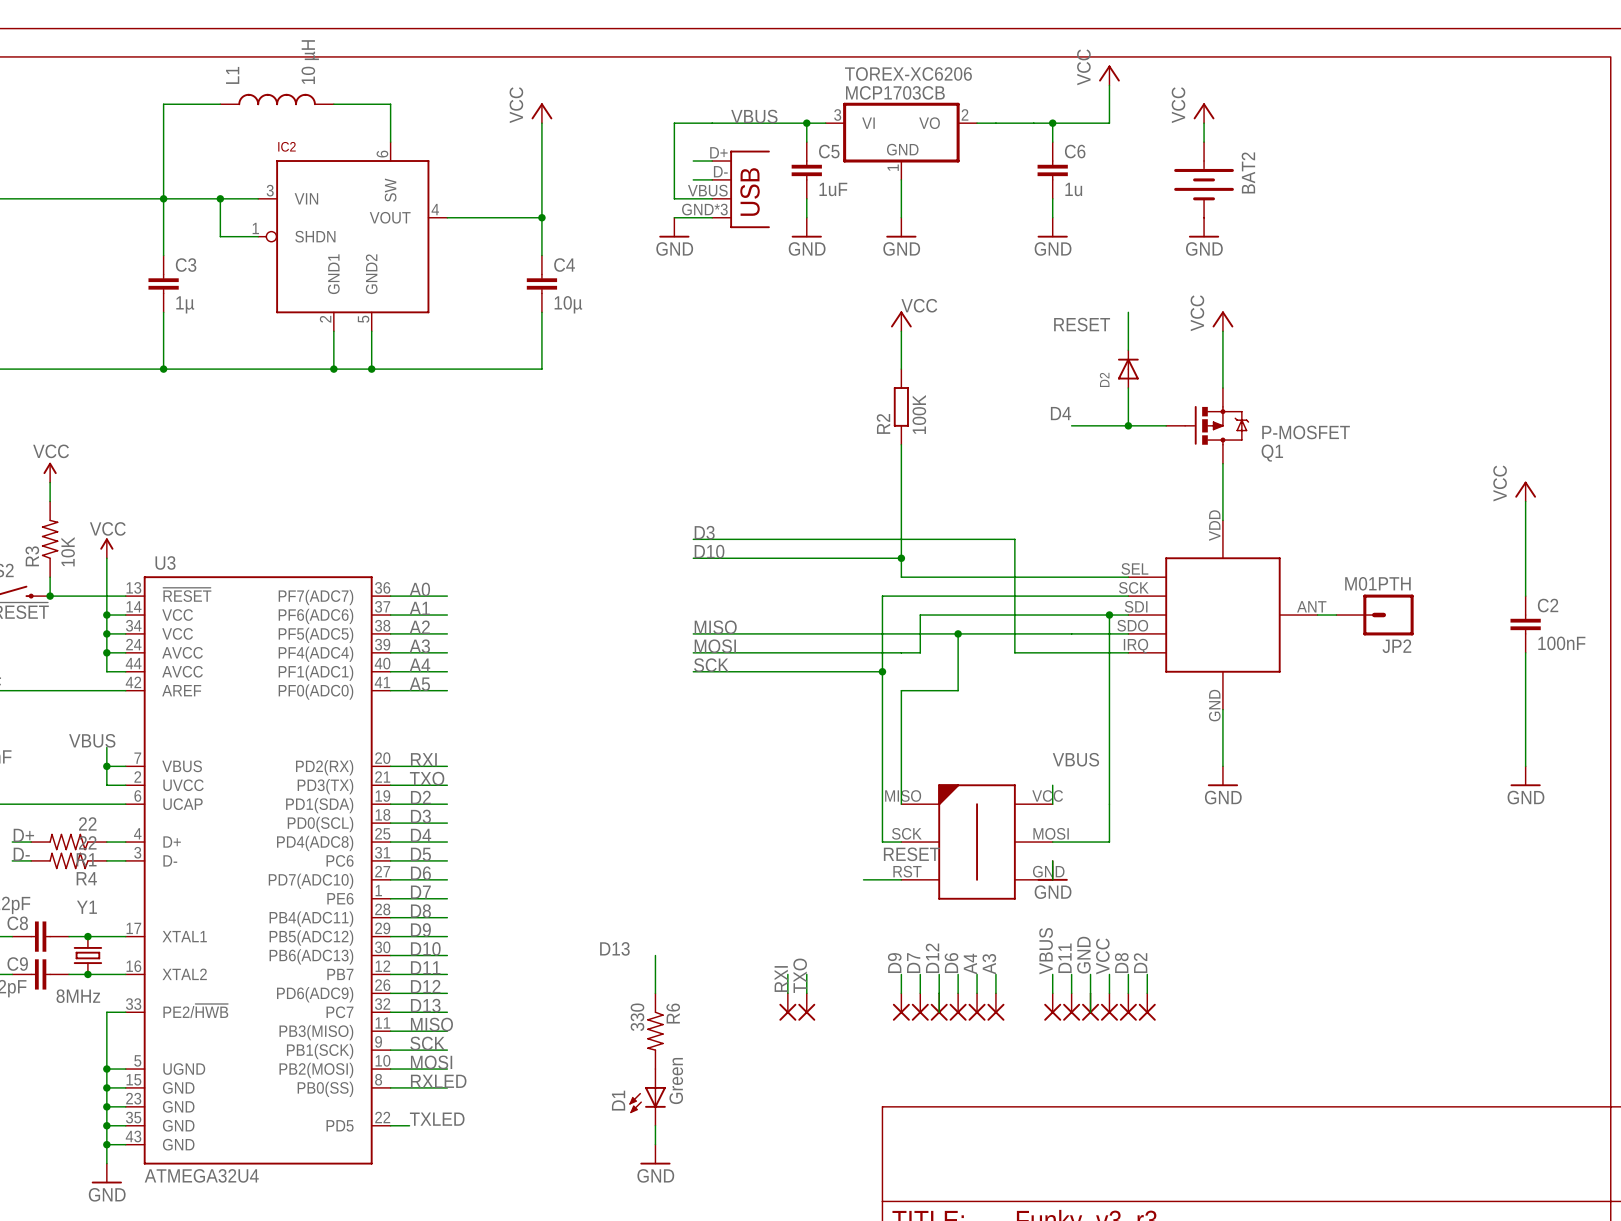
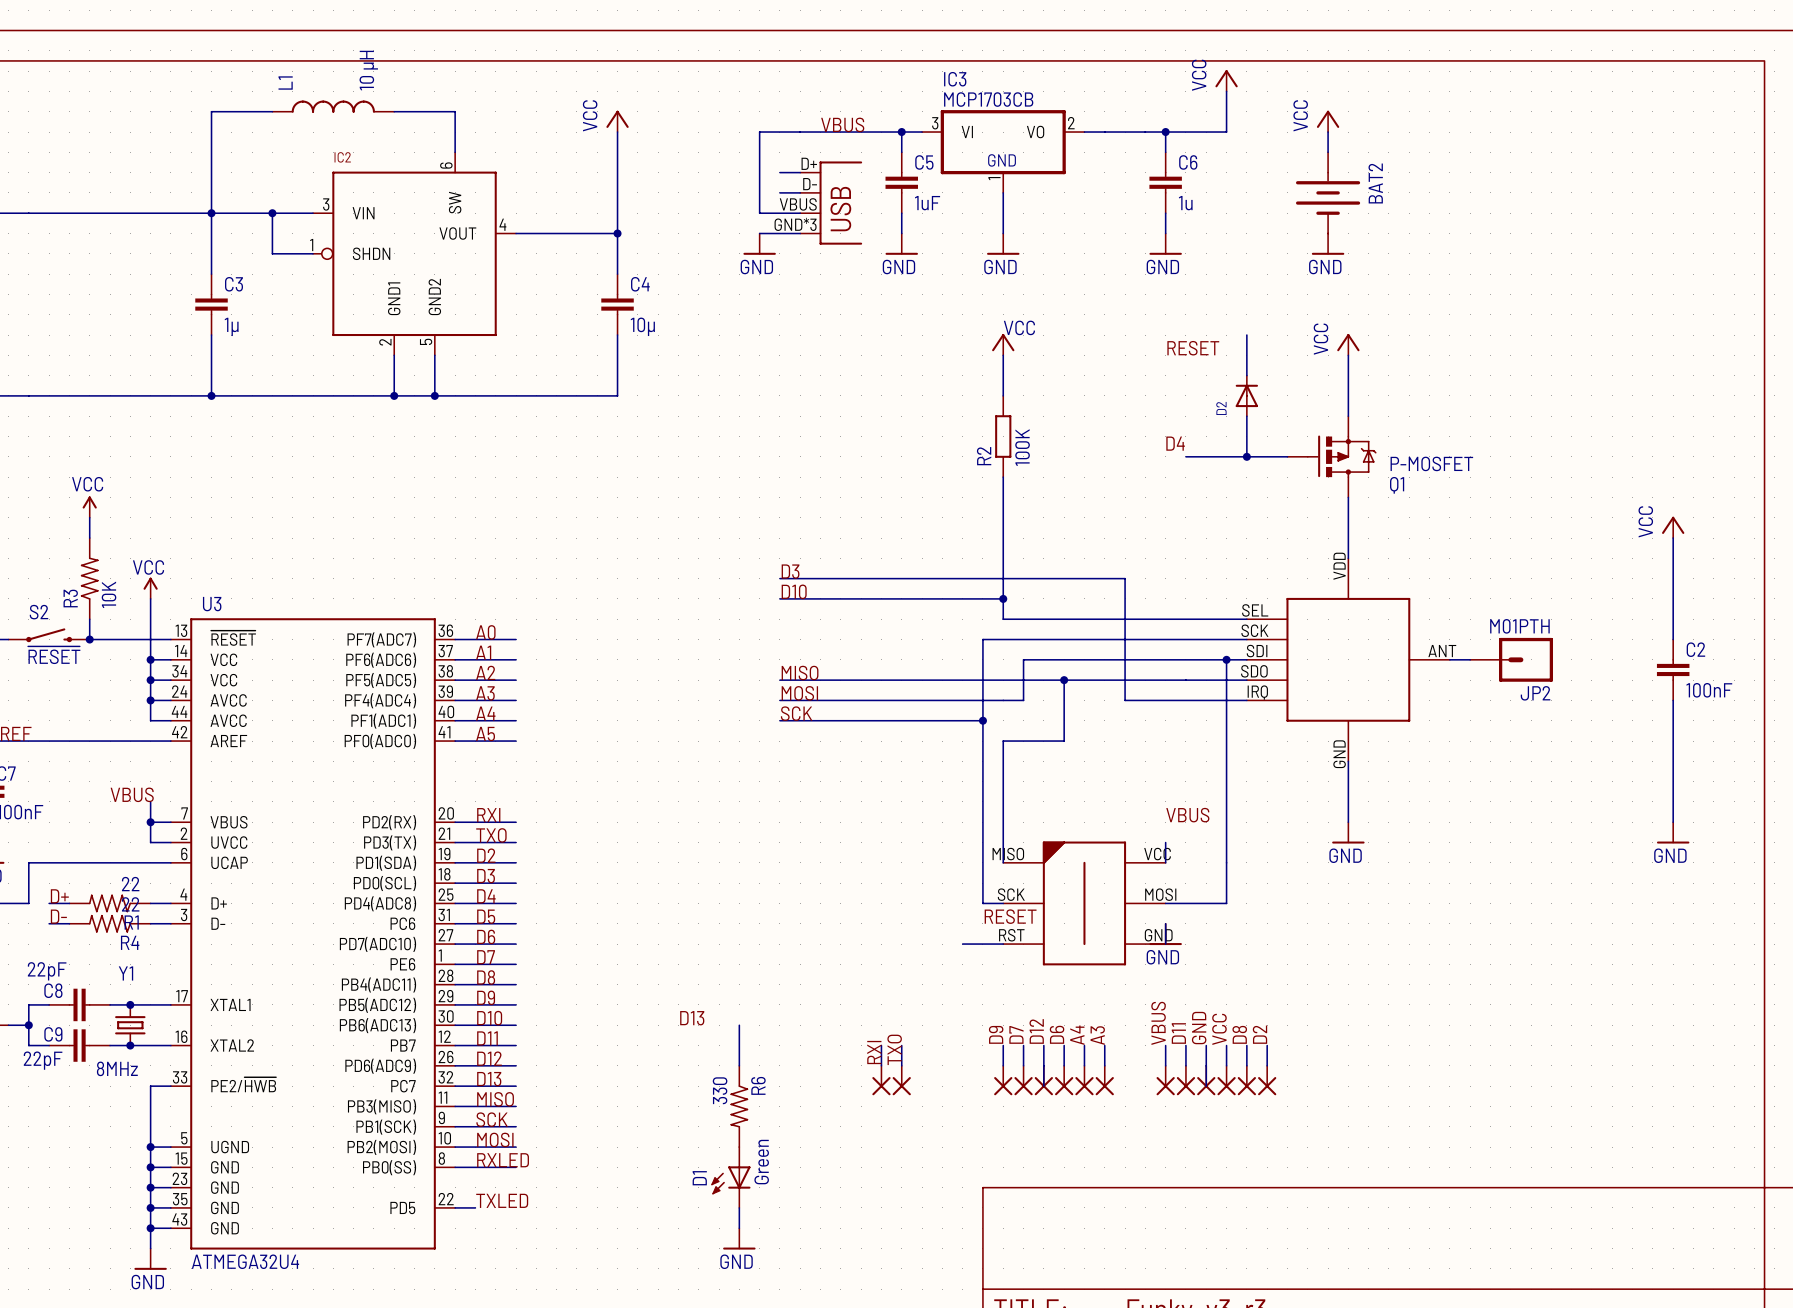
TOREX-XC6206 name: TOREX-XC6206 (908, 73) -> IC3 (955, 79)

